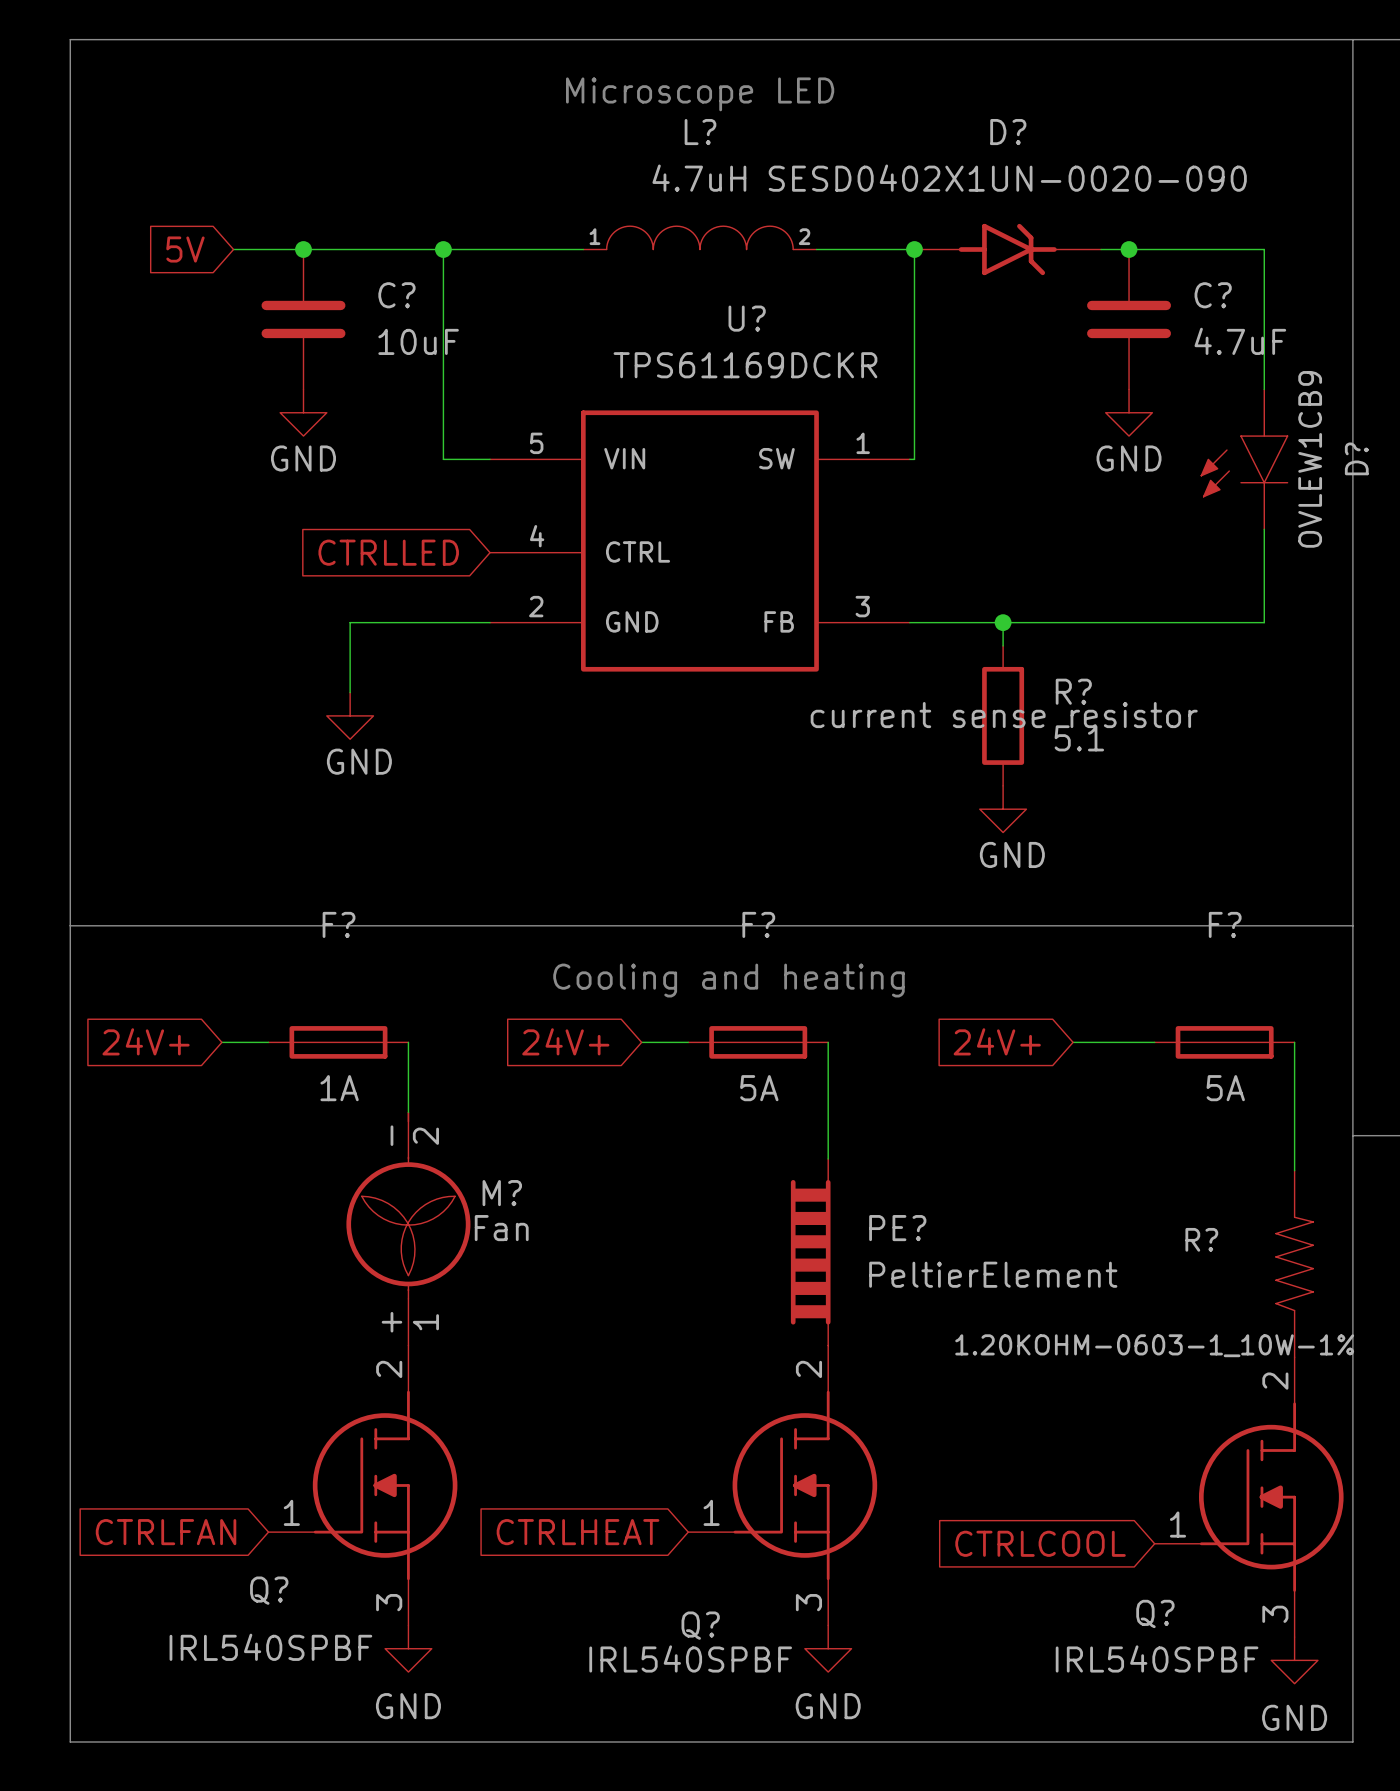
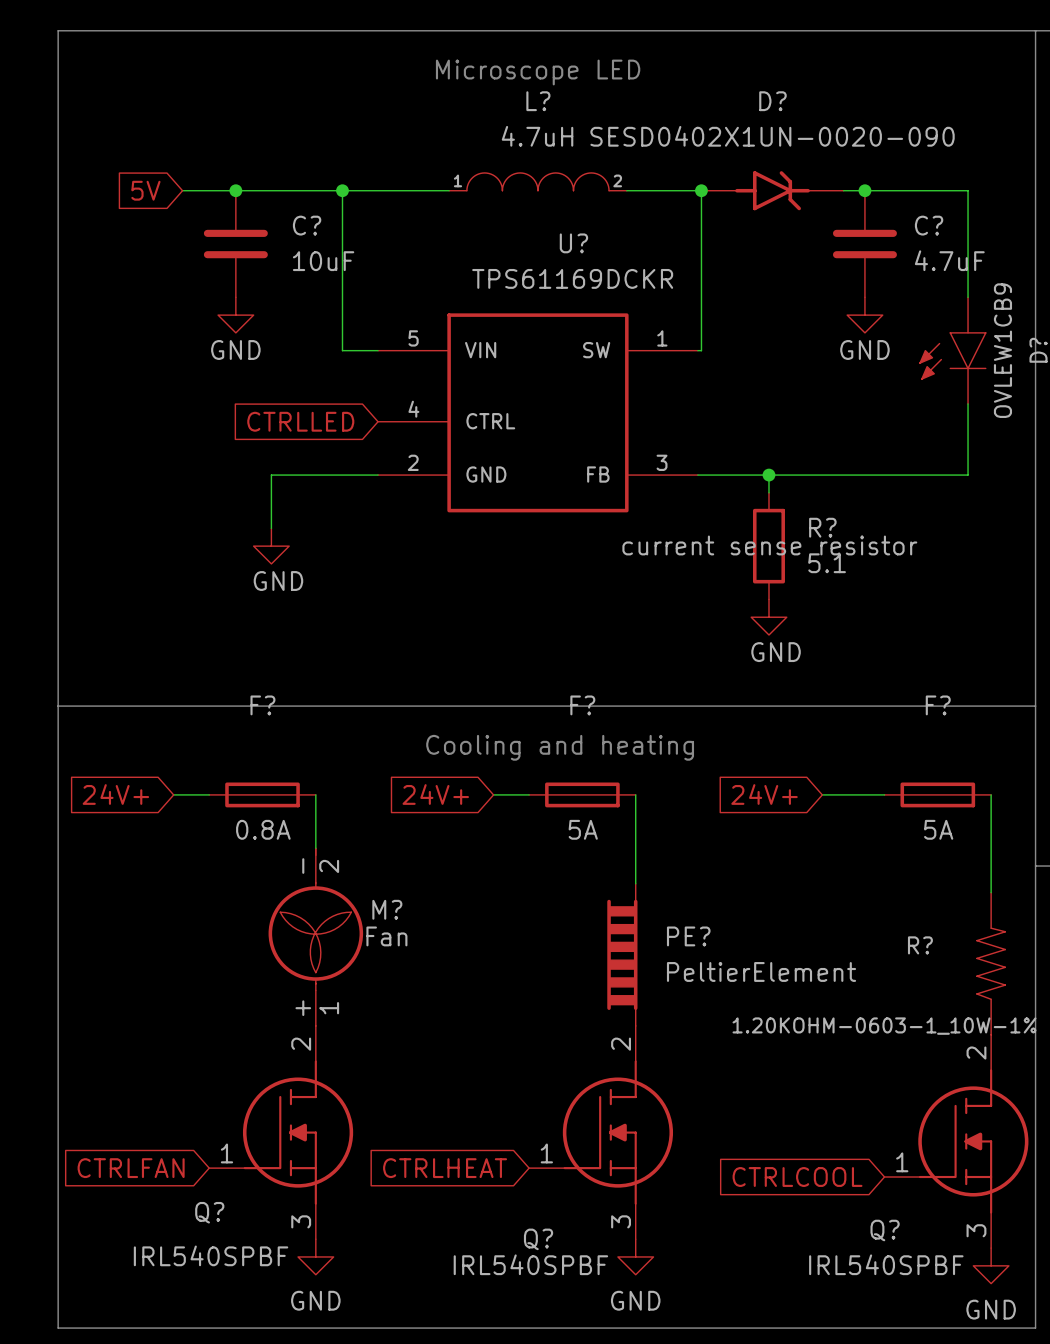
F? value: 1A (339, 1088) -> 0.8A (263, 829)

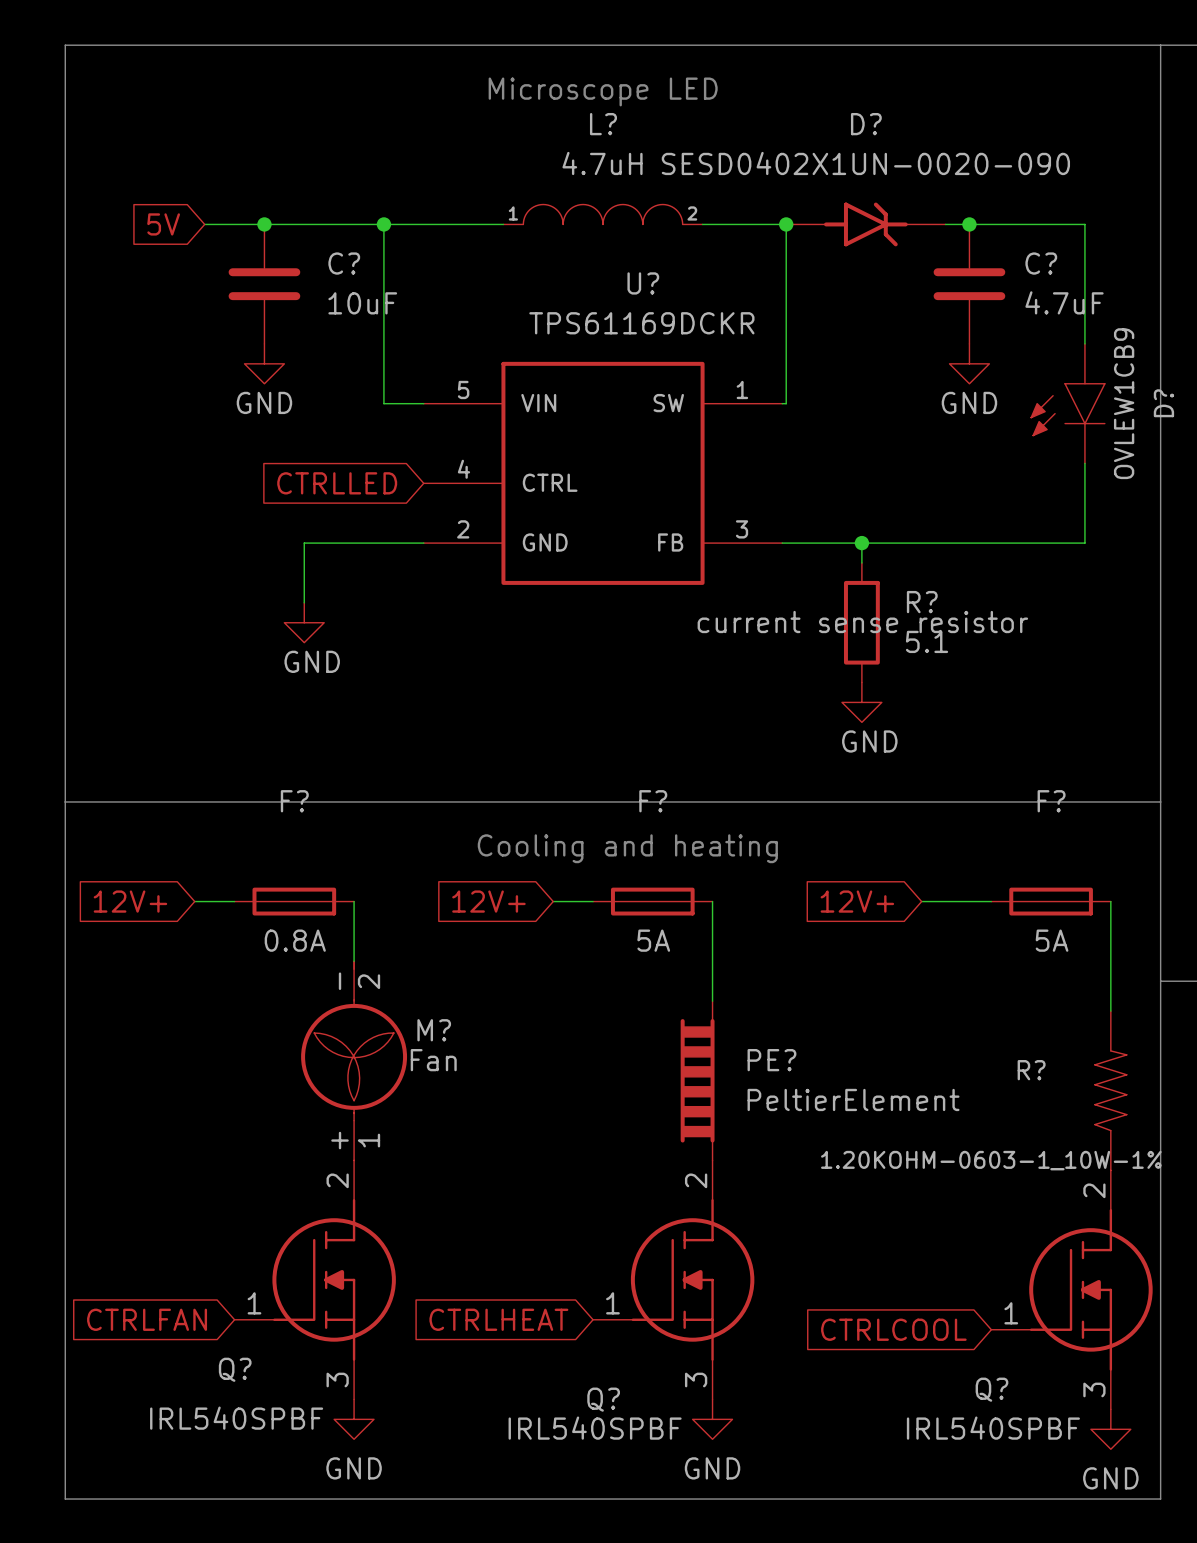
global label: 24V+ (115, 794) -> 12V+ (130, 901)
global label: 24V+ (435, 794) -> 12V+ (488, 901)
global label: 24V+ (764, 794) -> 12V+ (857, 901)

